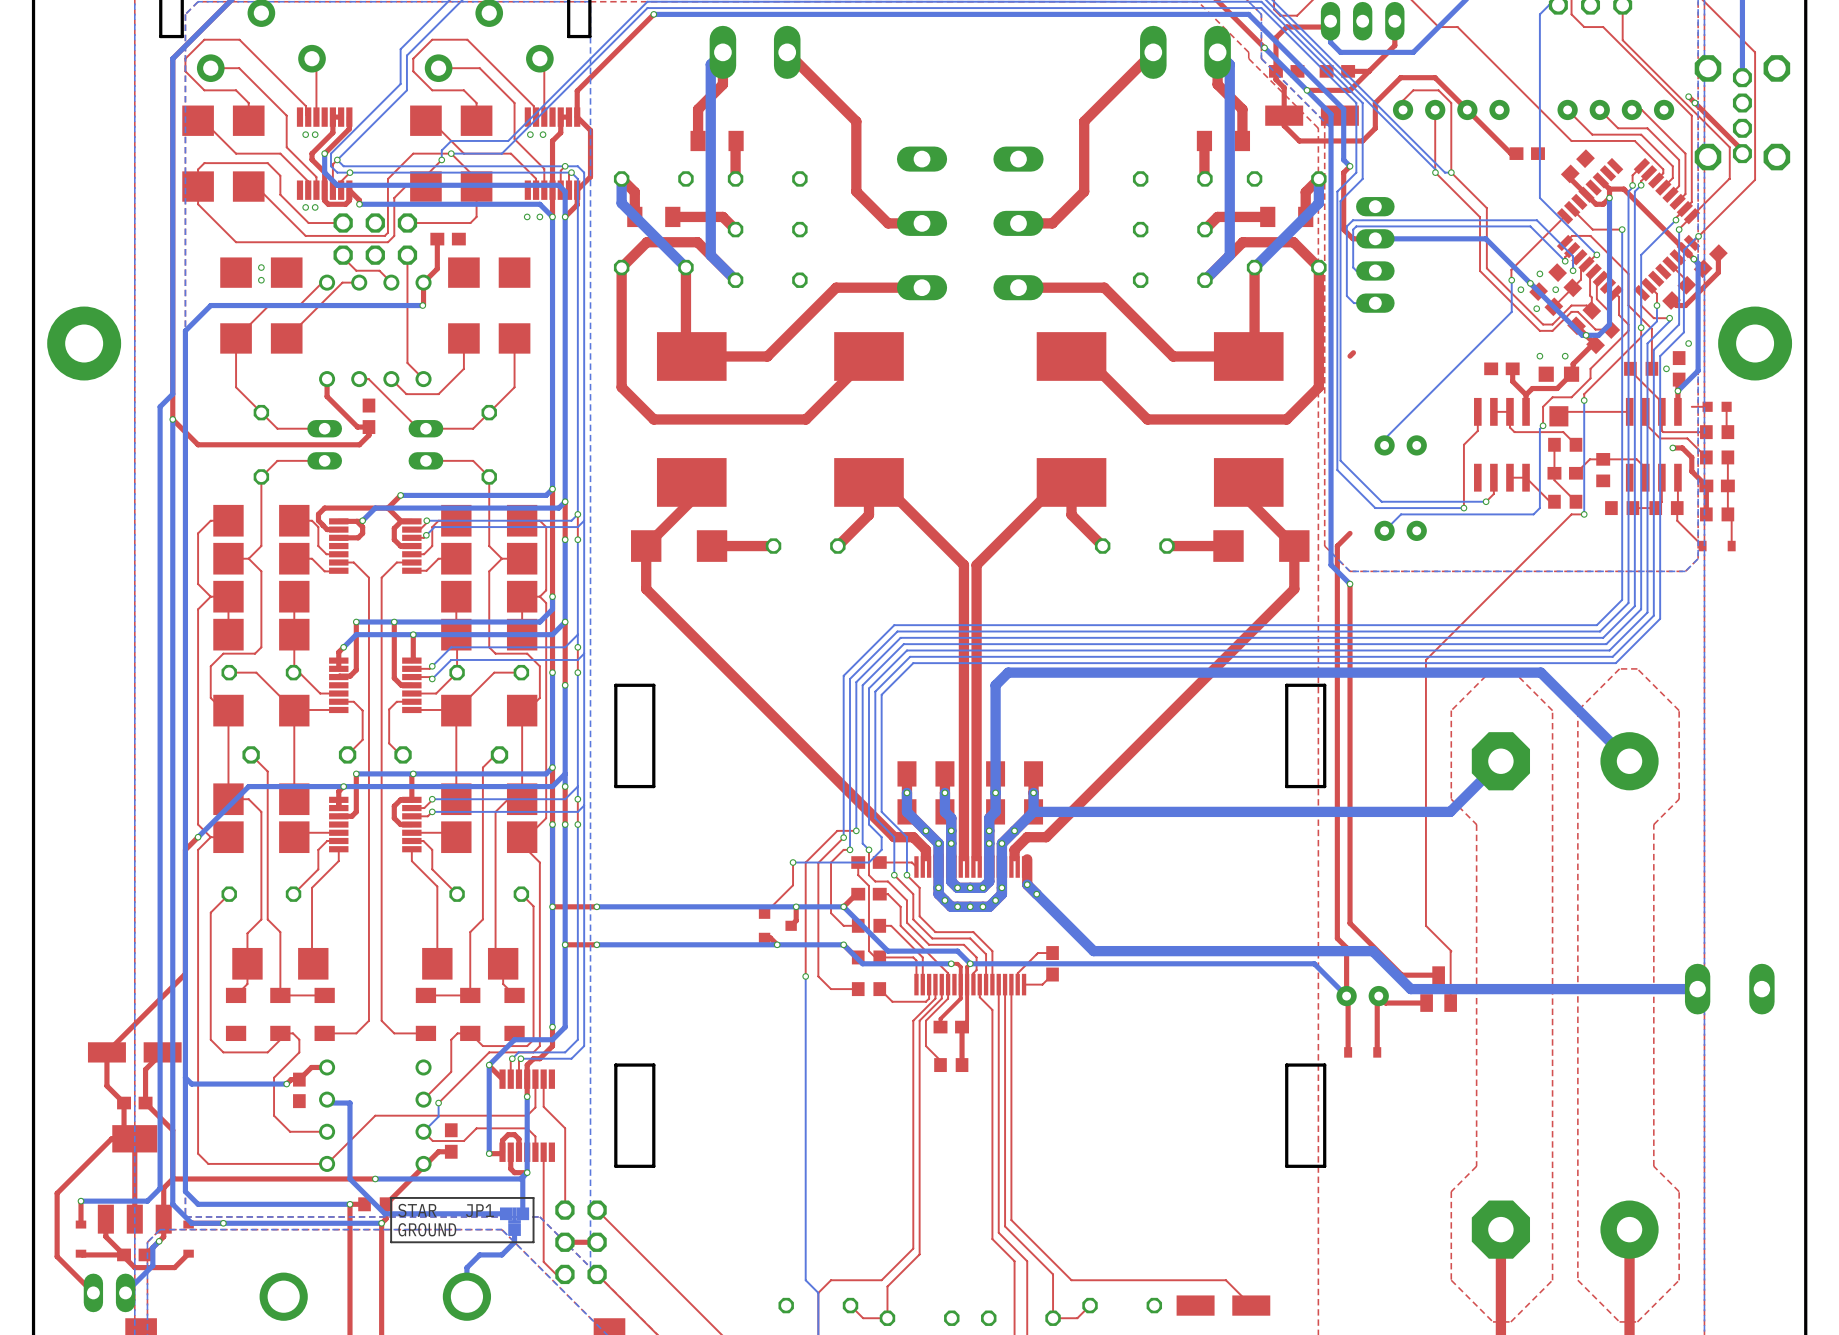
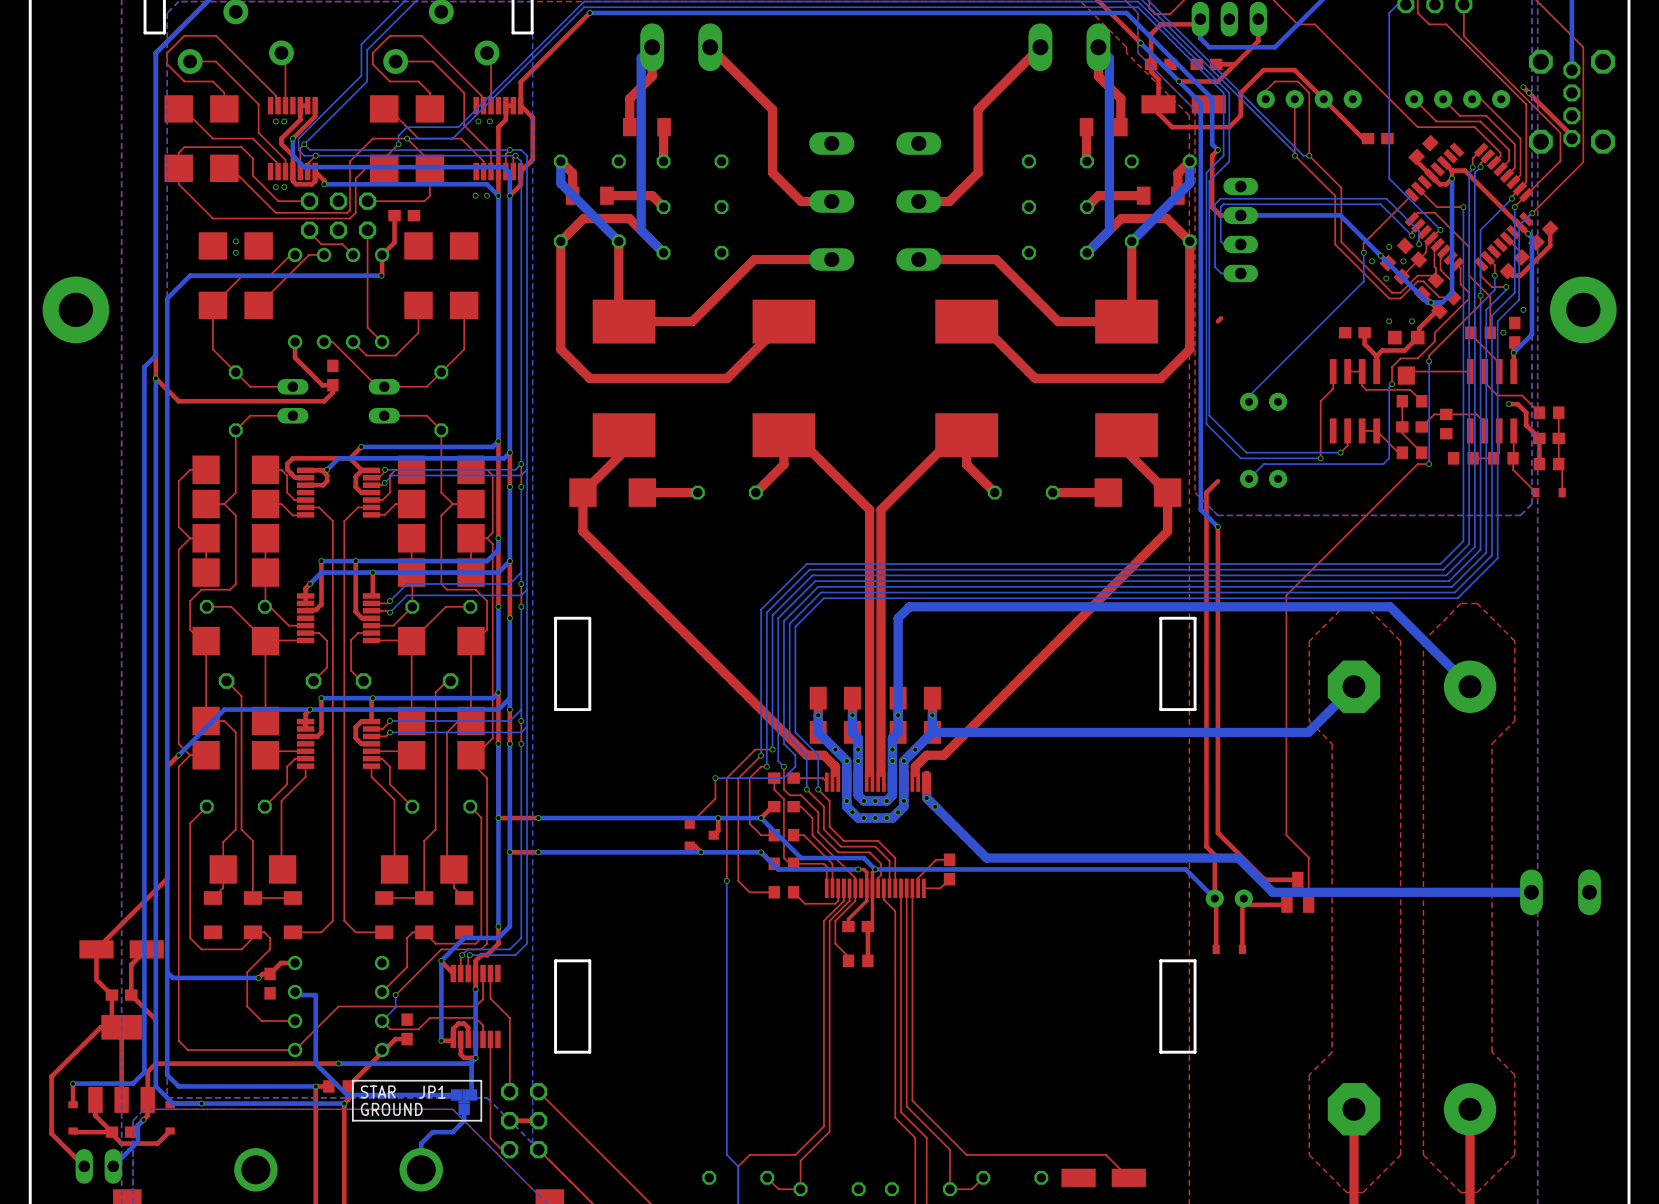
top track: (1707, 406) (1691, 406) -> none
part: (1717, 406) -> none
top track: (1726, 406) (1727, 432) -> none
top track: (1661, 411) (1663, 432) (1706, 432) -> none
part: (1717, 432) -> none

